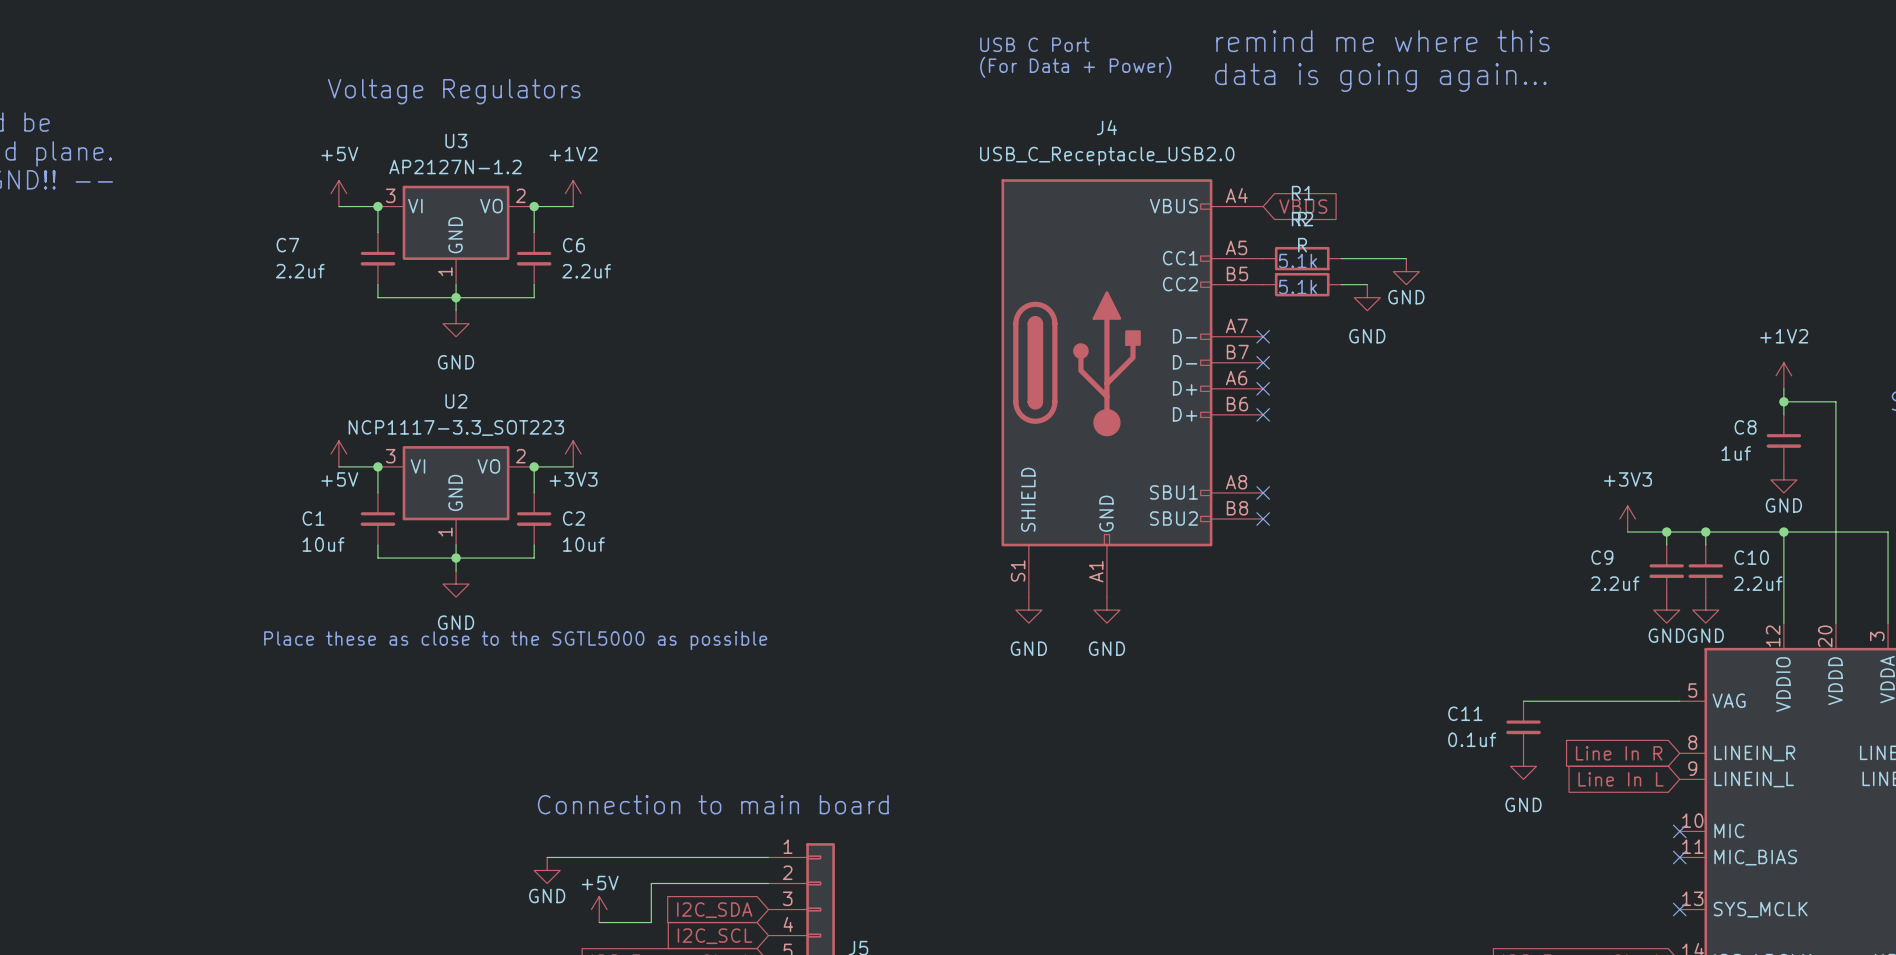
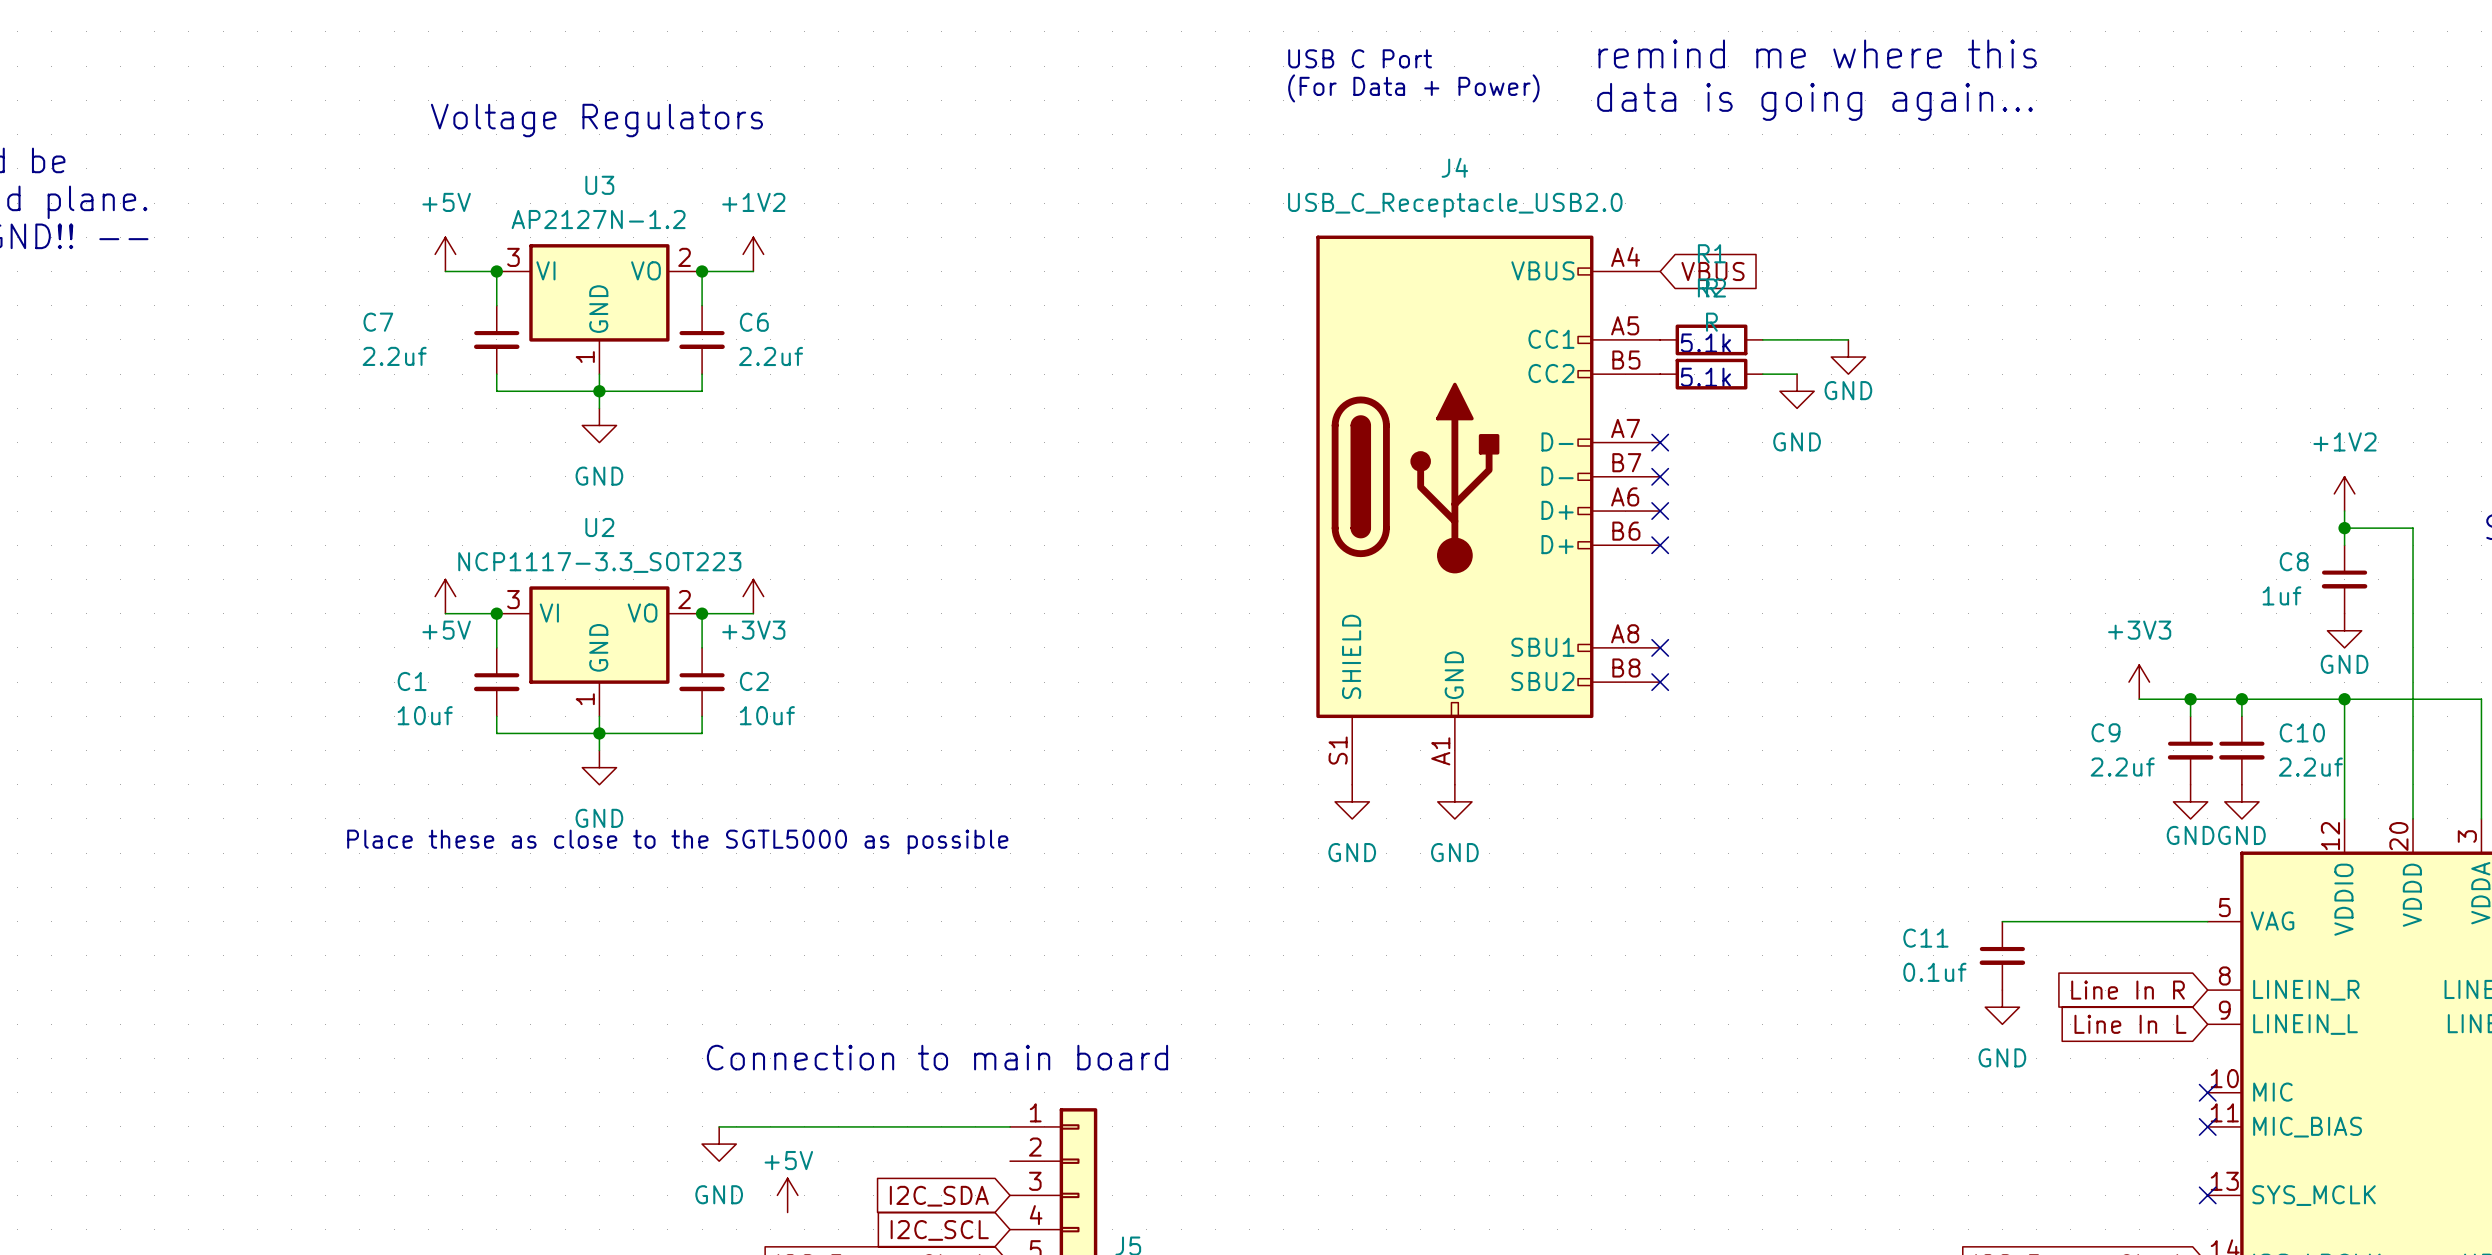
wire: (768, 883) (651, 883) (651, 922) (599, 922) -> none
power symbol text position: GND (547, 896) -> GND (719, 1194)

